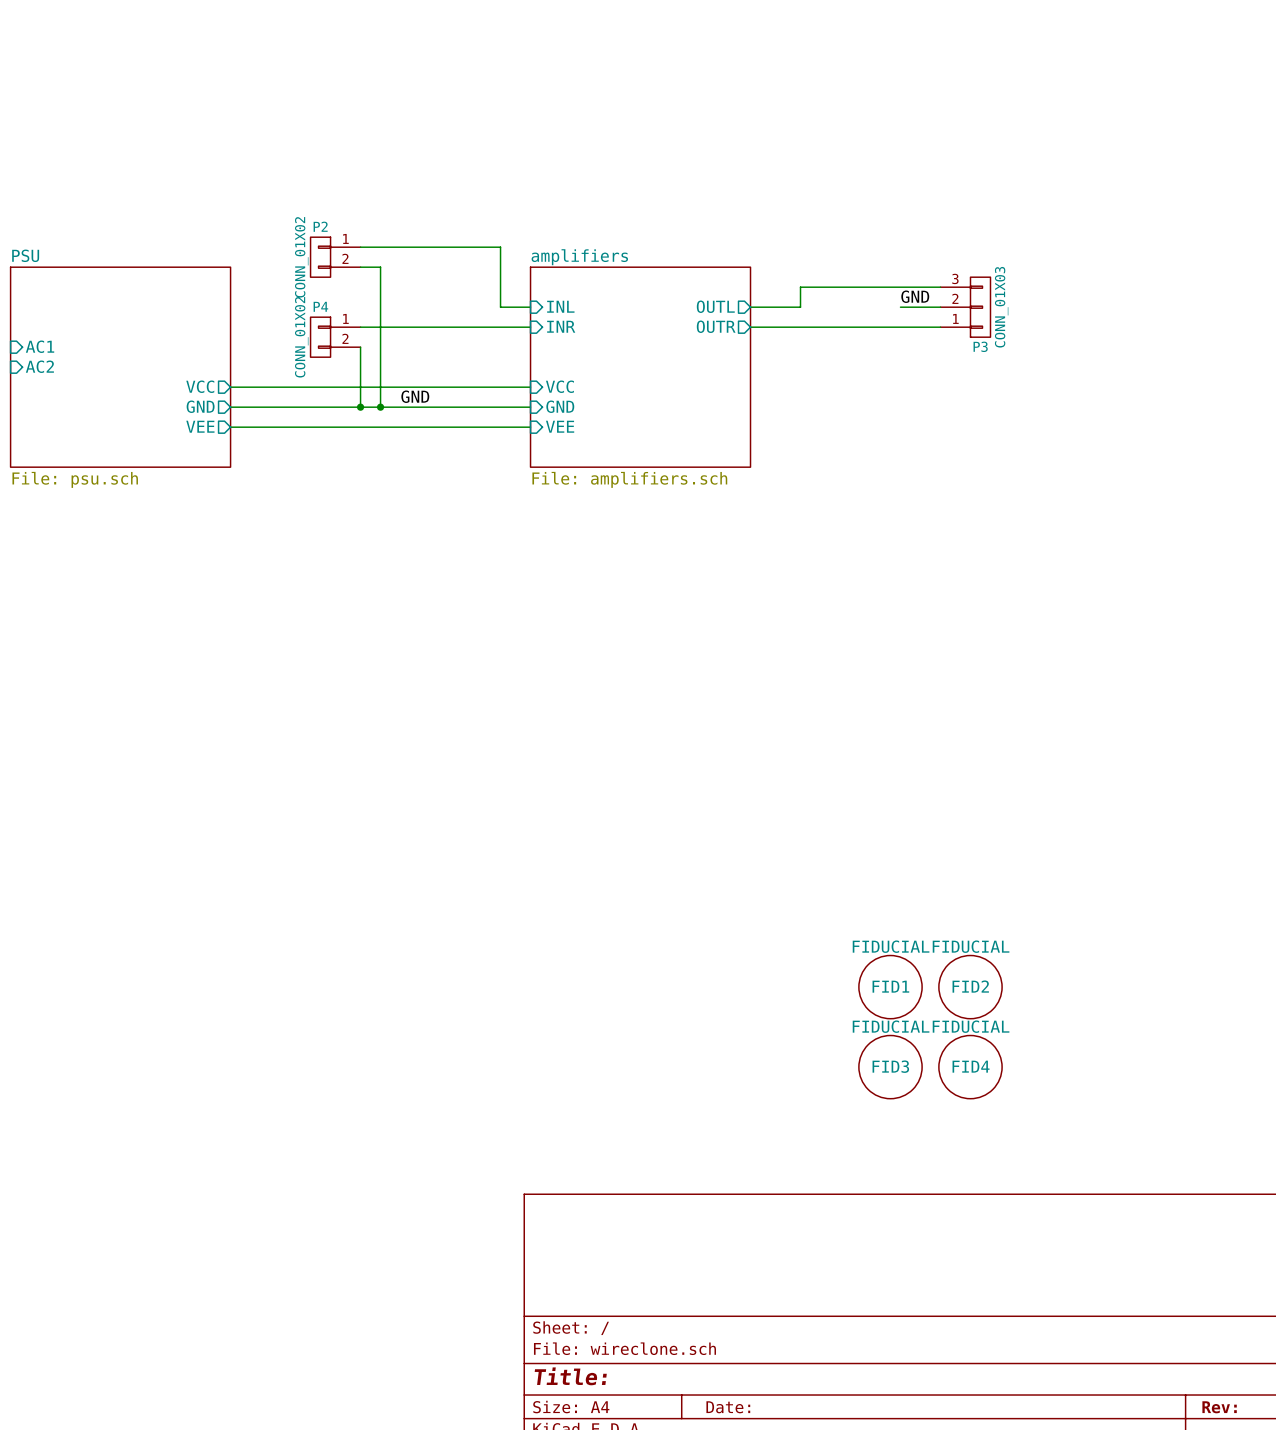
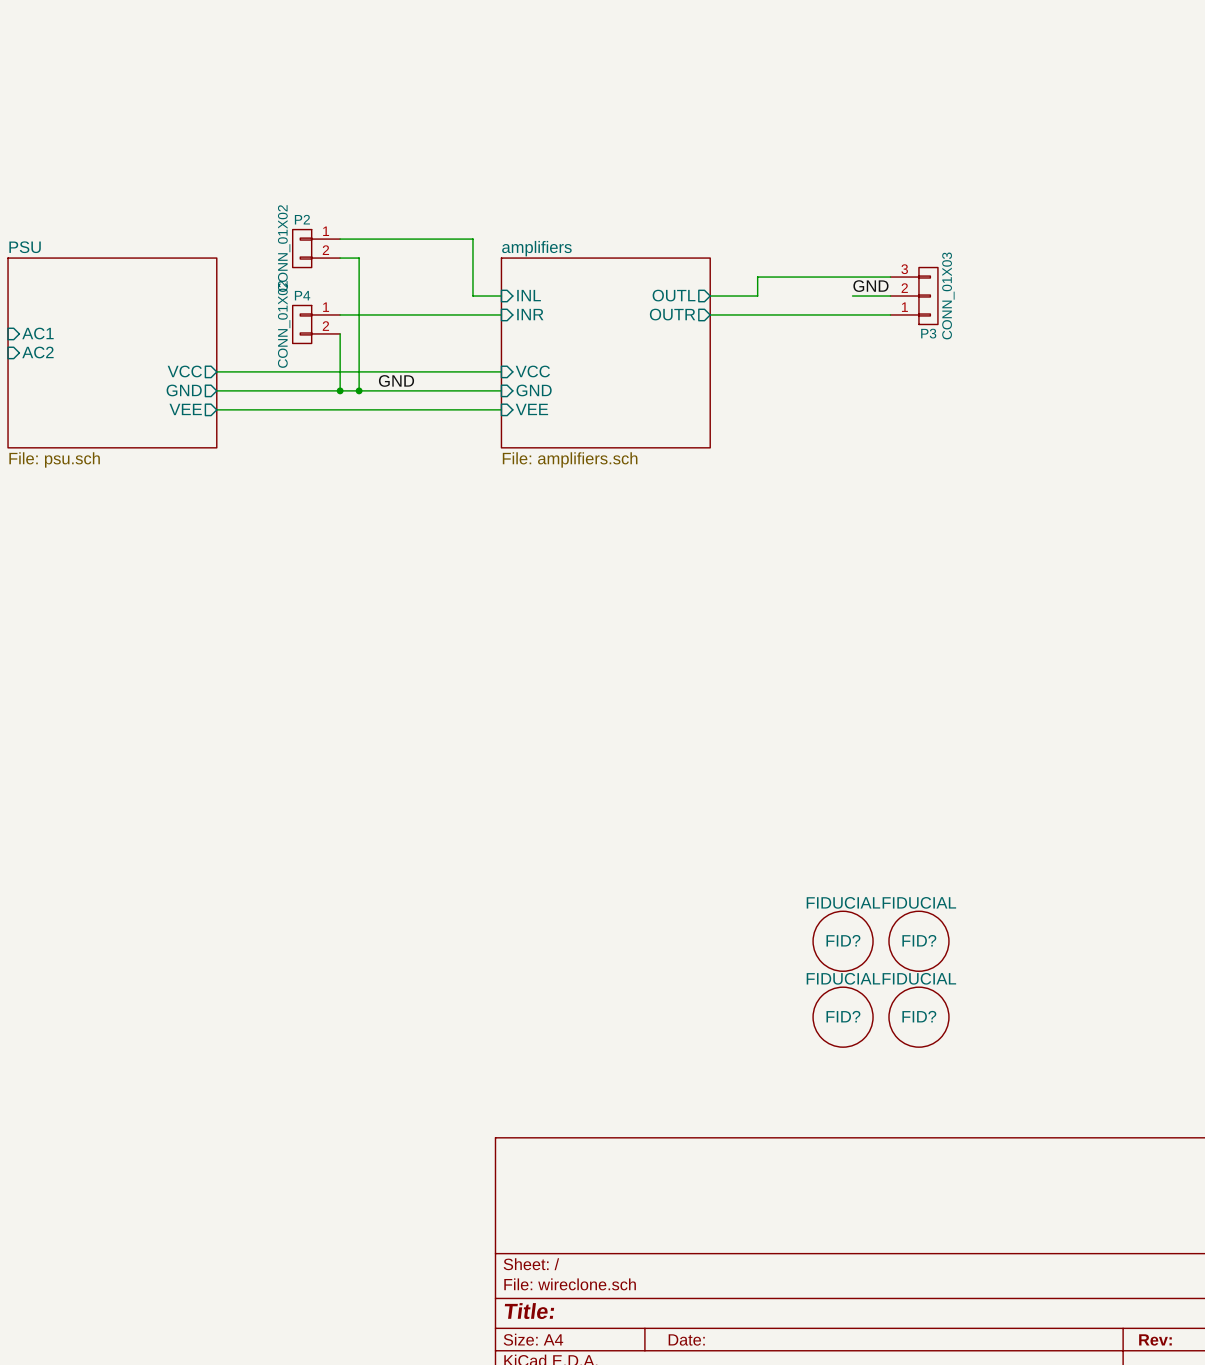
FID1 name: FID1 (890, 986) -> FID? (843, 940)
FID2 name: FID2 (970, 986) -> FID? (919, 940)
FID3 name: FID3 (890, 1066) -> FID? (843, 1016)
FID4 name: FID4 (971, 1066) -> FID? (919, 1016)

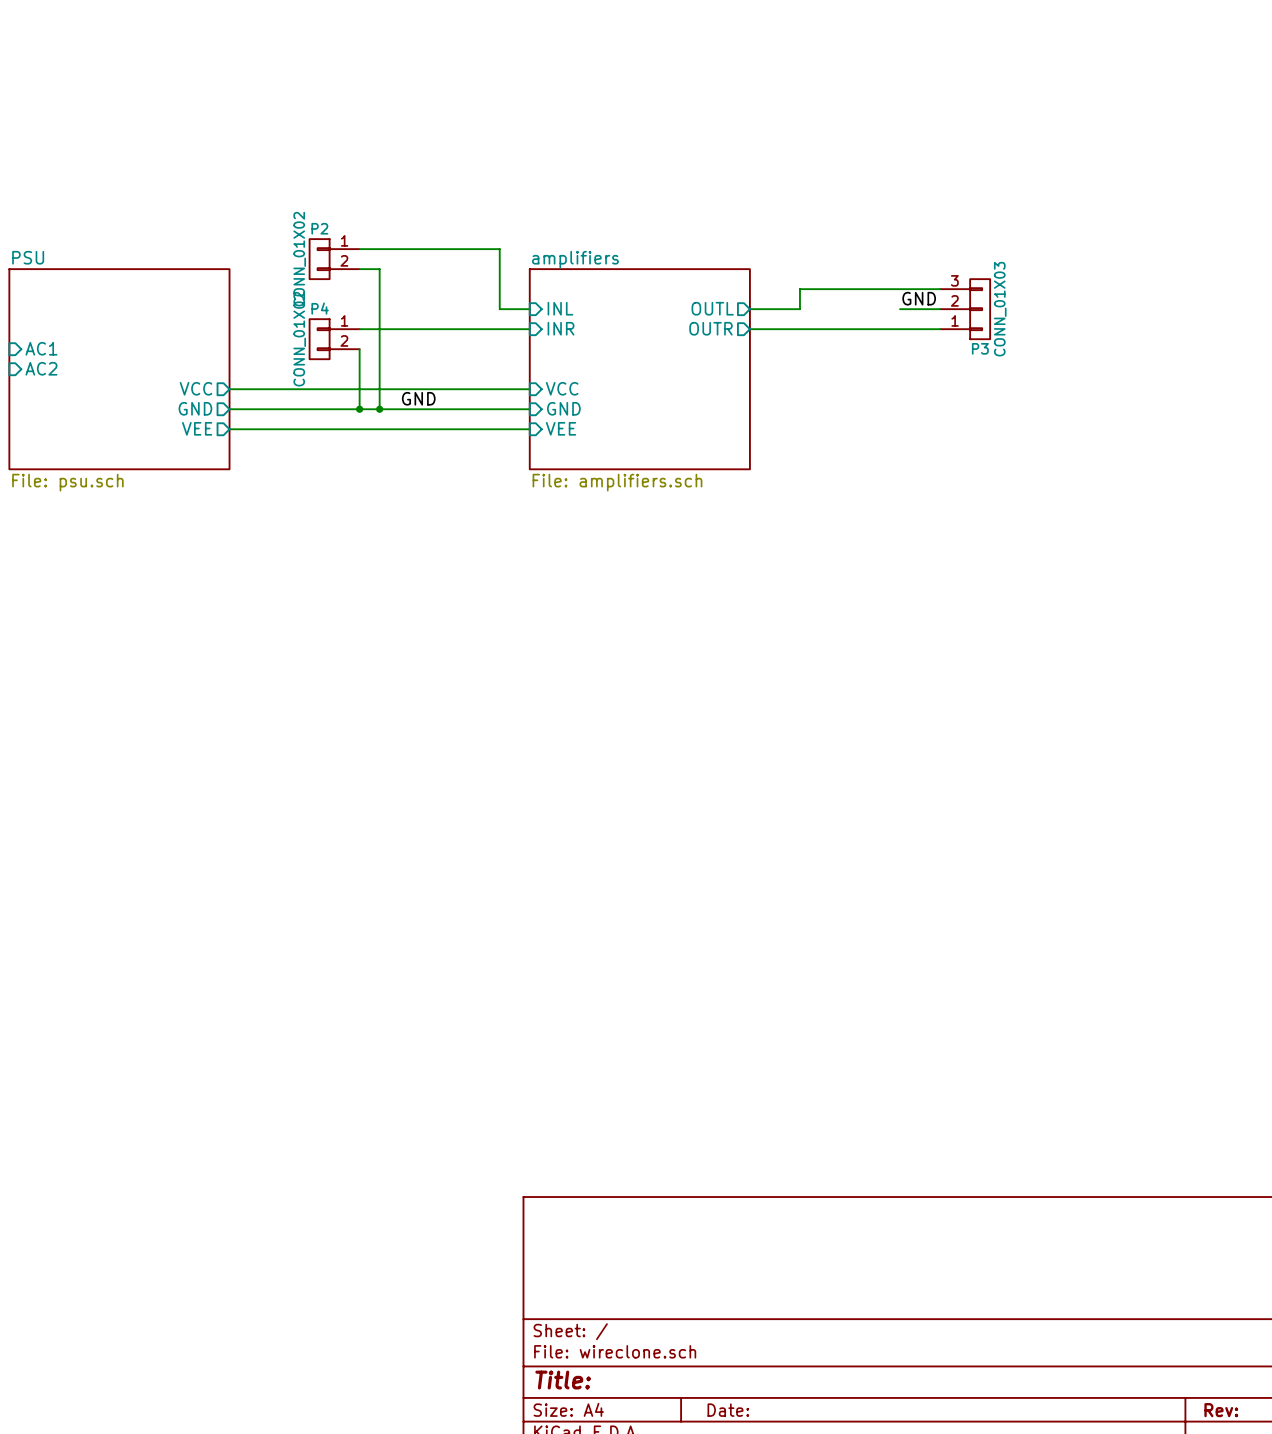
FID?: FIDUCIAL (843, 941) -> none
FID?: FIDUCIAL (918, 941) -> none
FID?: FIDUCIAL (843, 1017) -> none
FID?: FIDUCIAL (918, 1017) -> none

